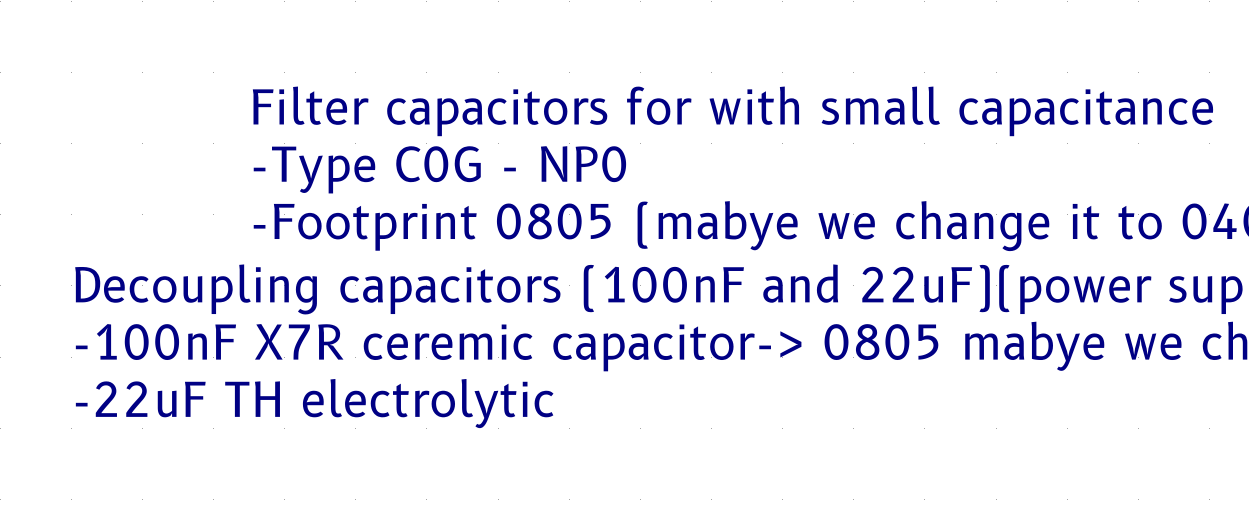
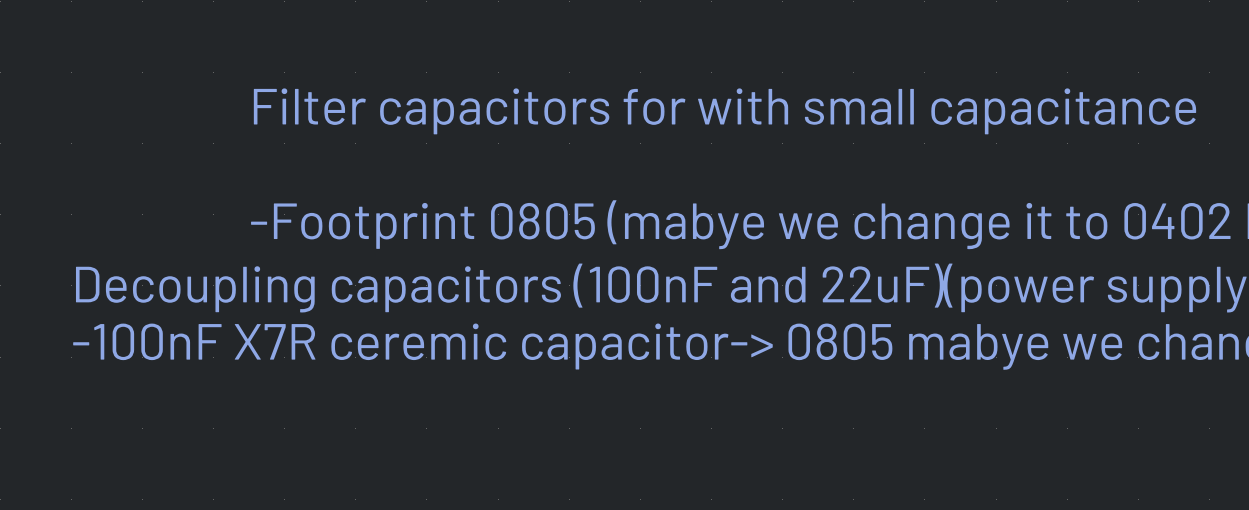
text: -Type C0G - NP0 (439, 169) -> none
text: -22uF TH electrolytic (314, 403) -> none

